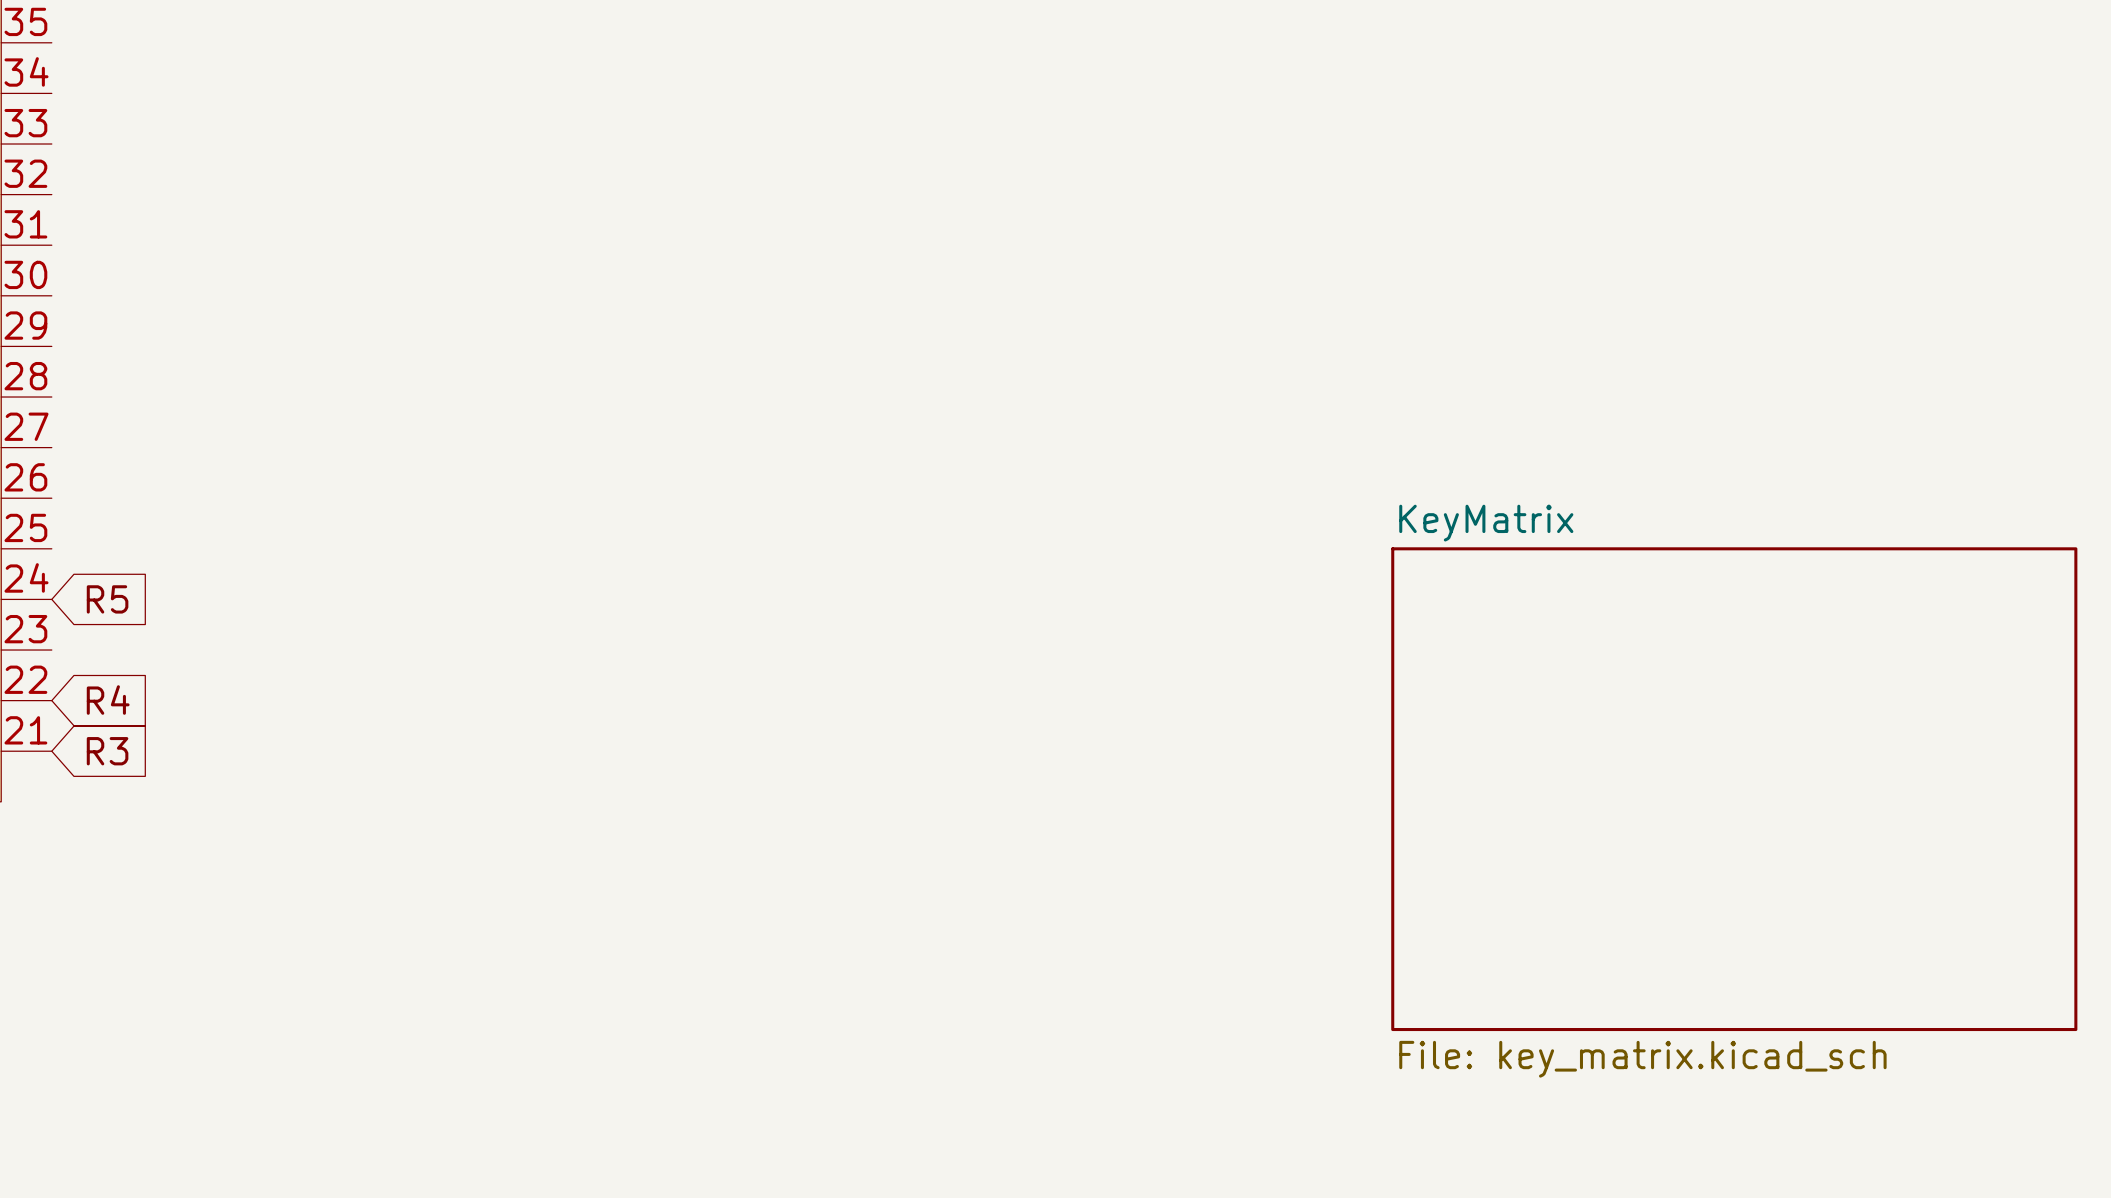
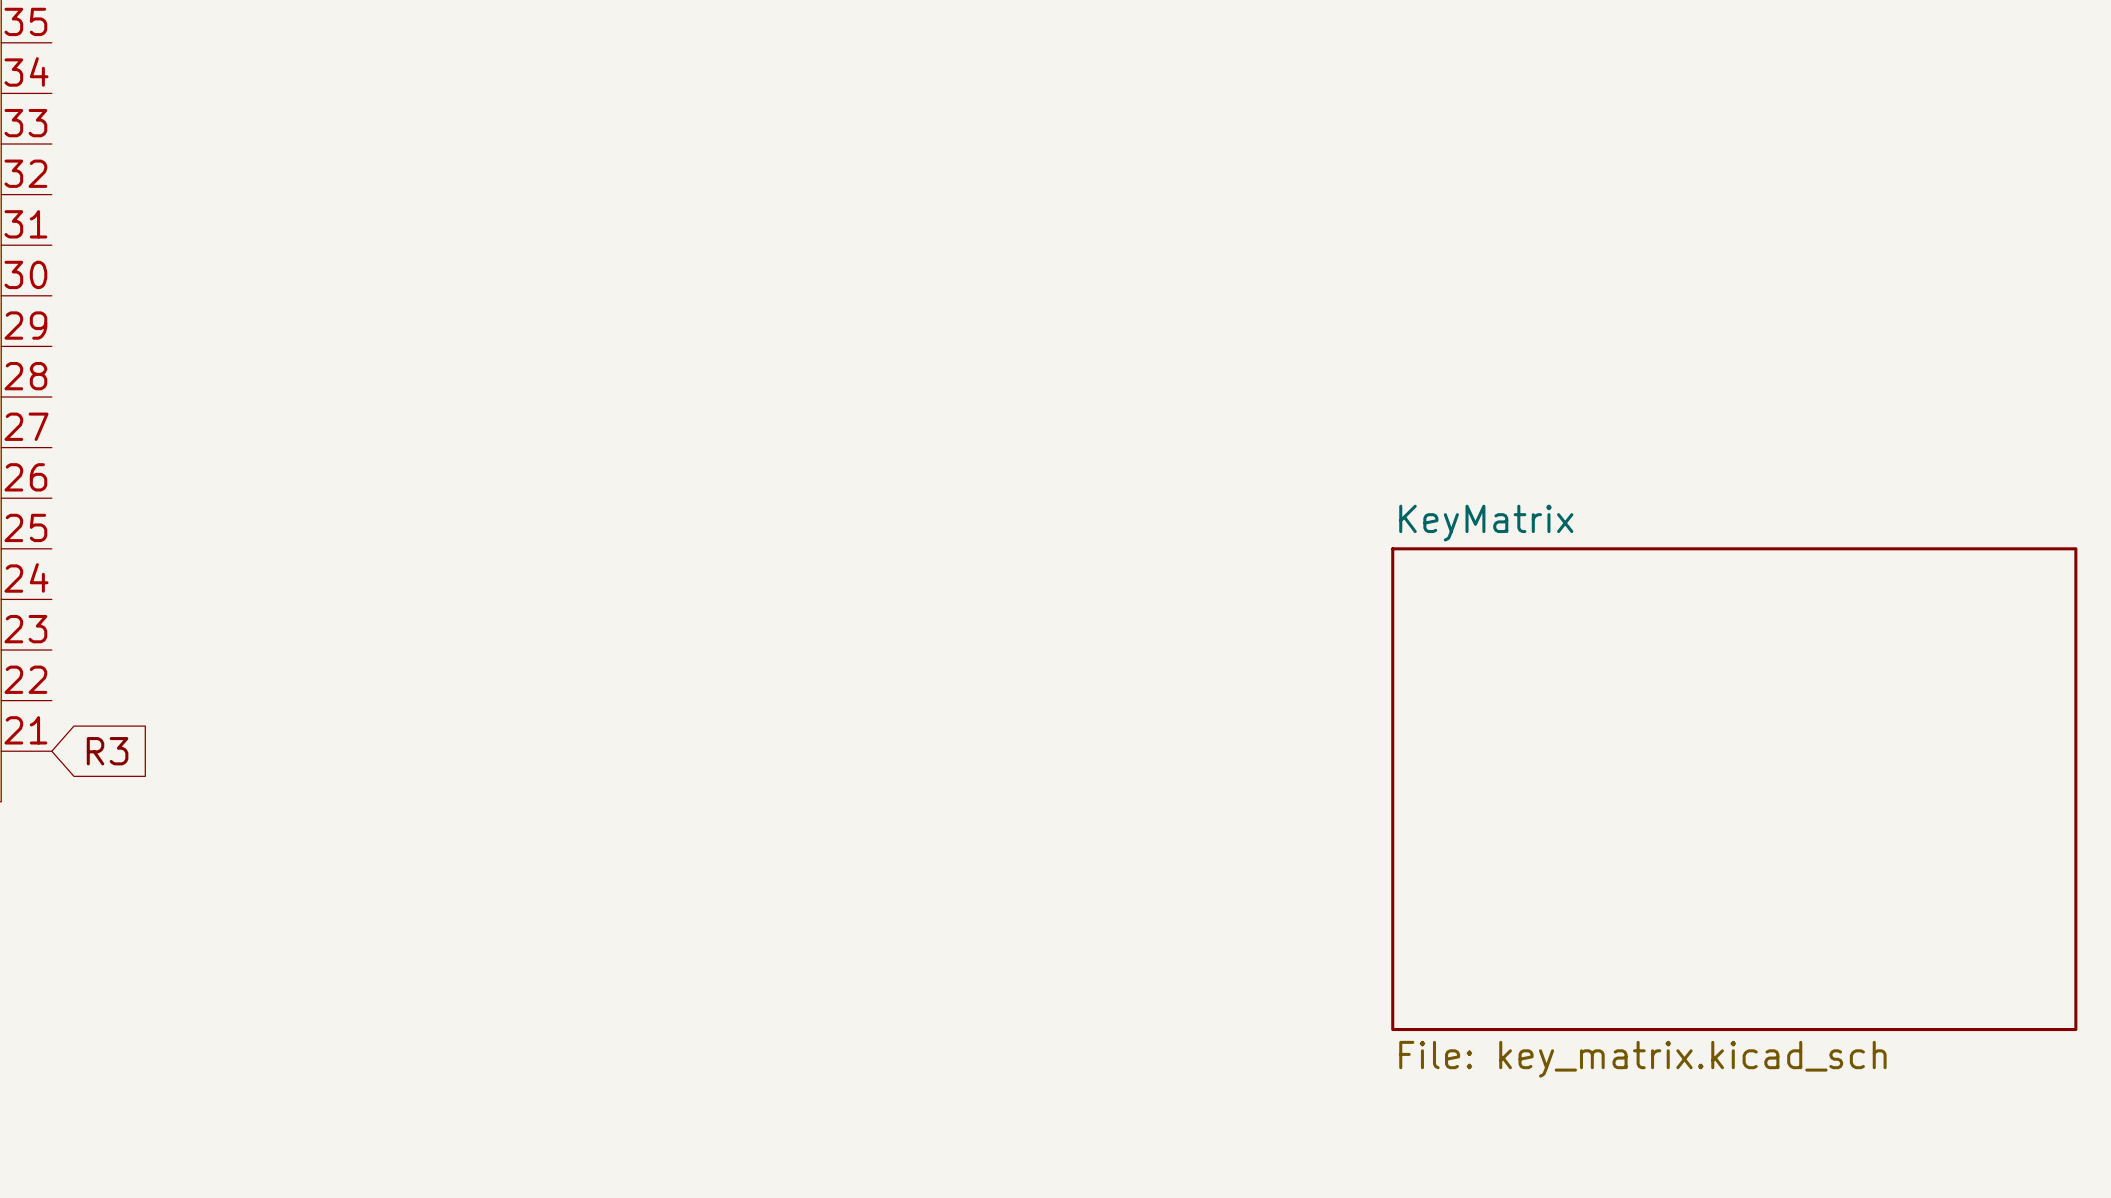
global label: R5 (107, 599) -> none
global label: R4 (108, 700) -> none

